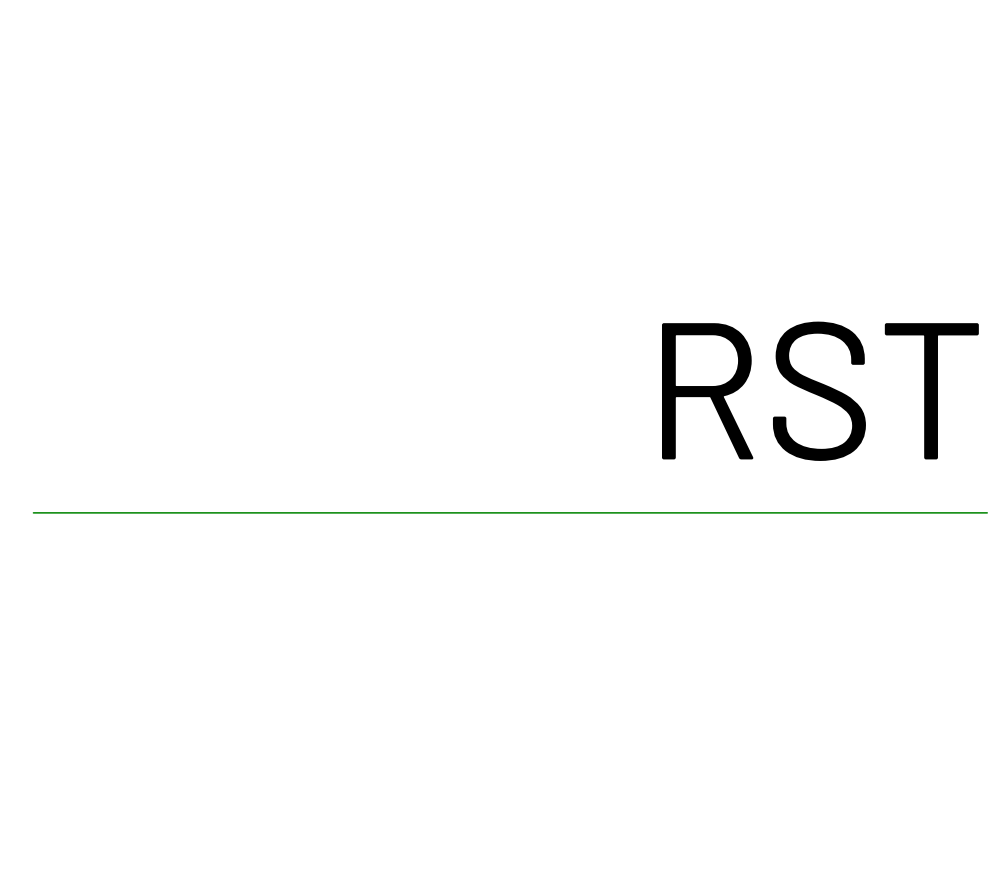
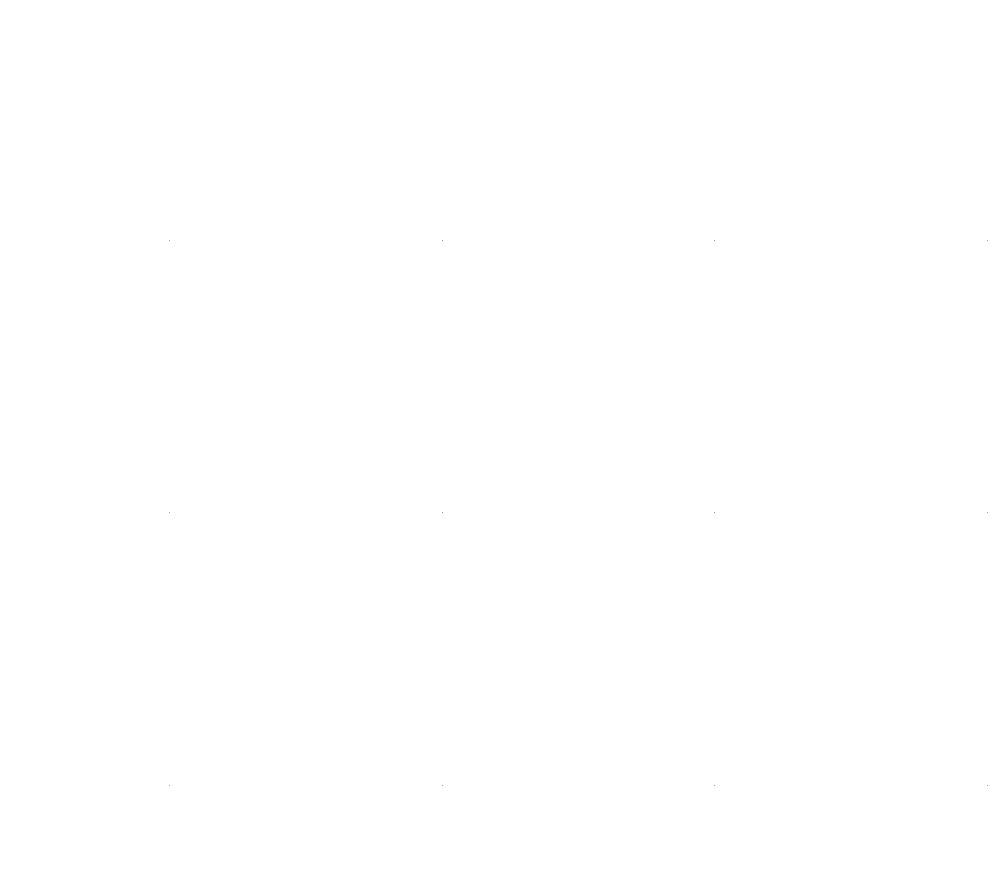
label: RST (820, 391) -> none
wire: (33, 512) (987, 512) -> none

